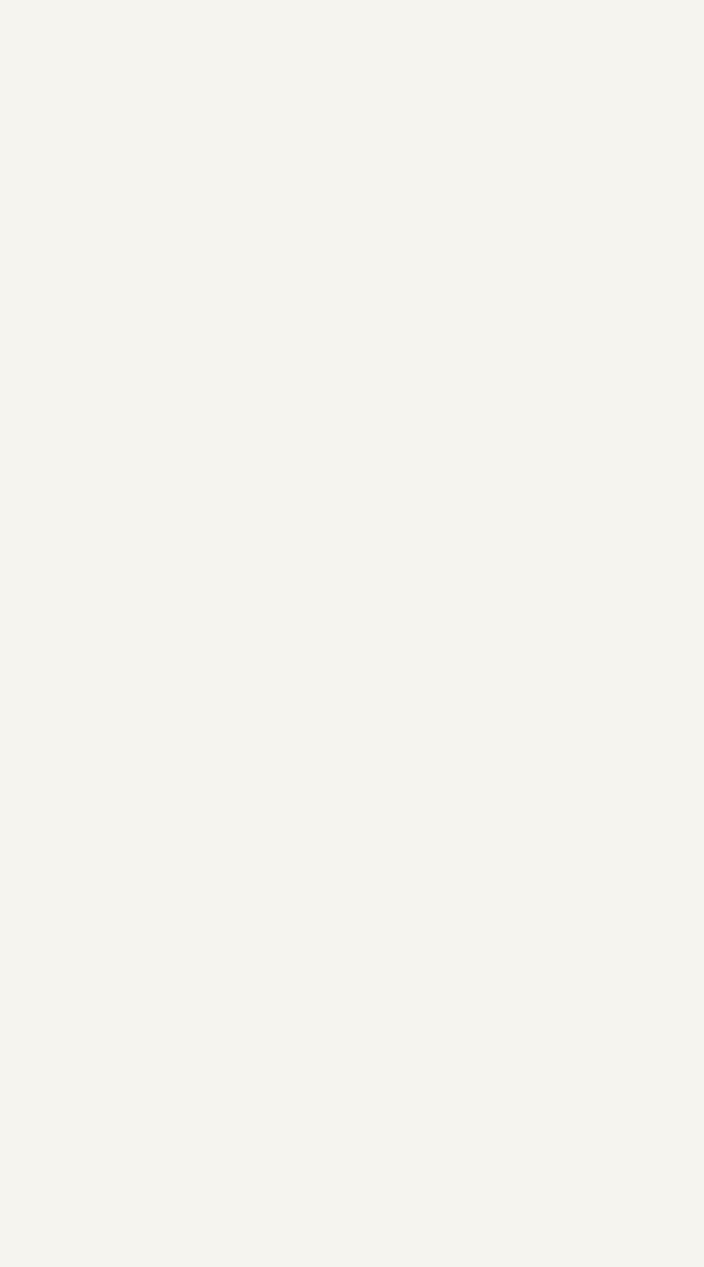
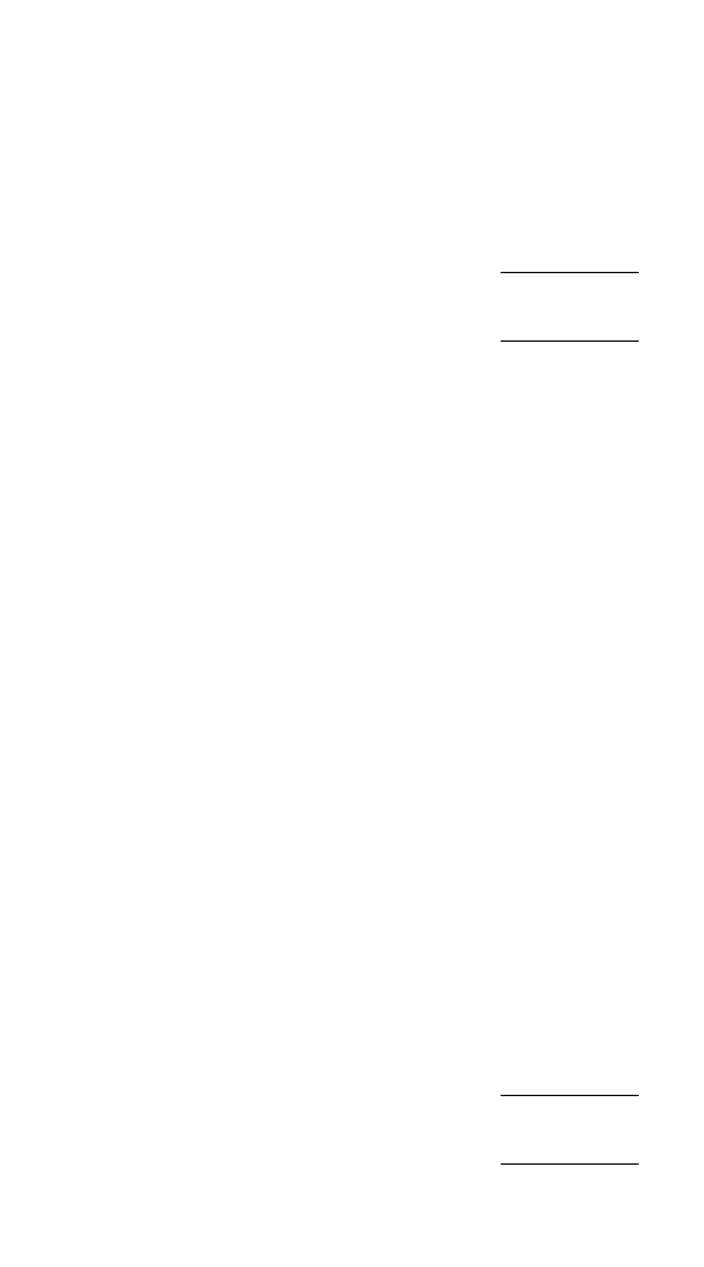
wire: none -> (501, 272) (638, 272)
wire: none -> (501, 341) (638, 341)
wire: none -> (501, 1095) (638, 1095)
wire: none -> (501, 1164) (638, 1164)

